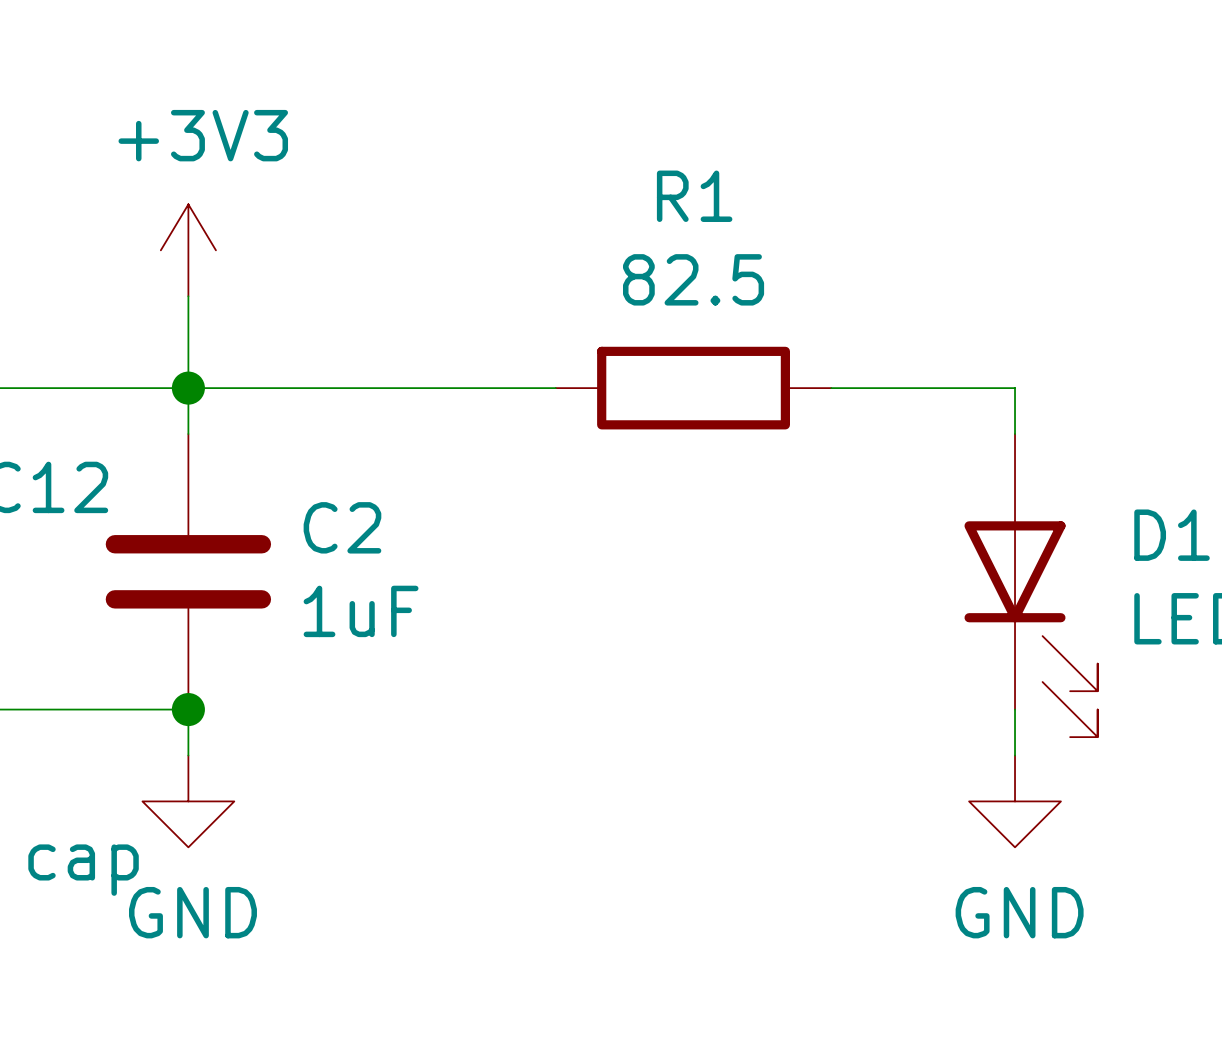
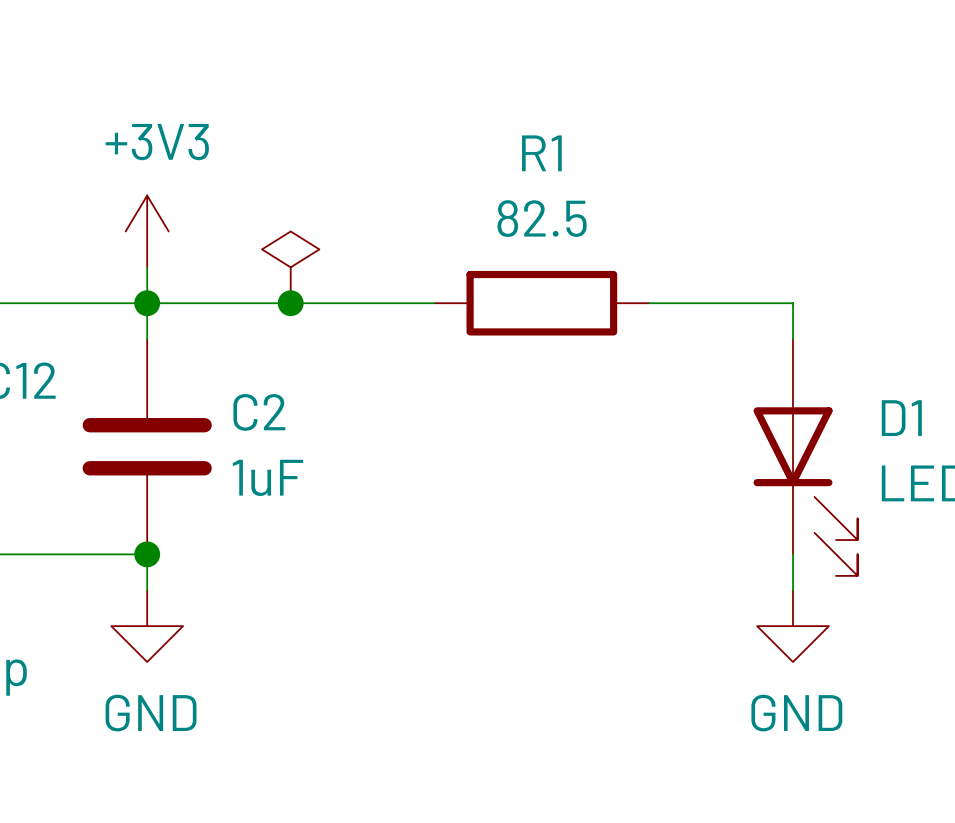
power symbol position: +3V3 (188, 250) -> +3V3 (147, 231)
power symbol: none -> (290, 267)
junction: none -> (290, 303)

